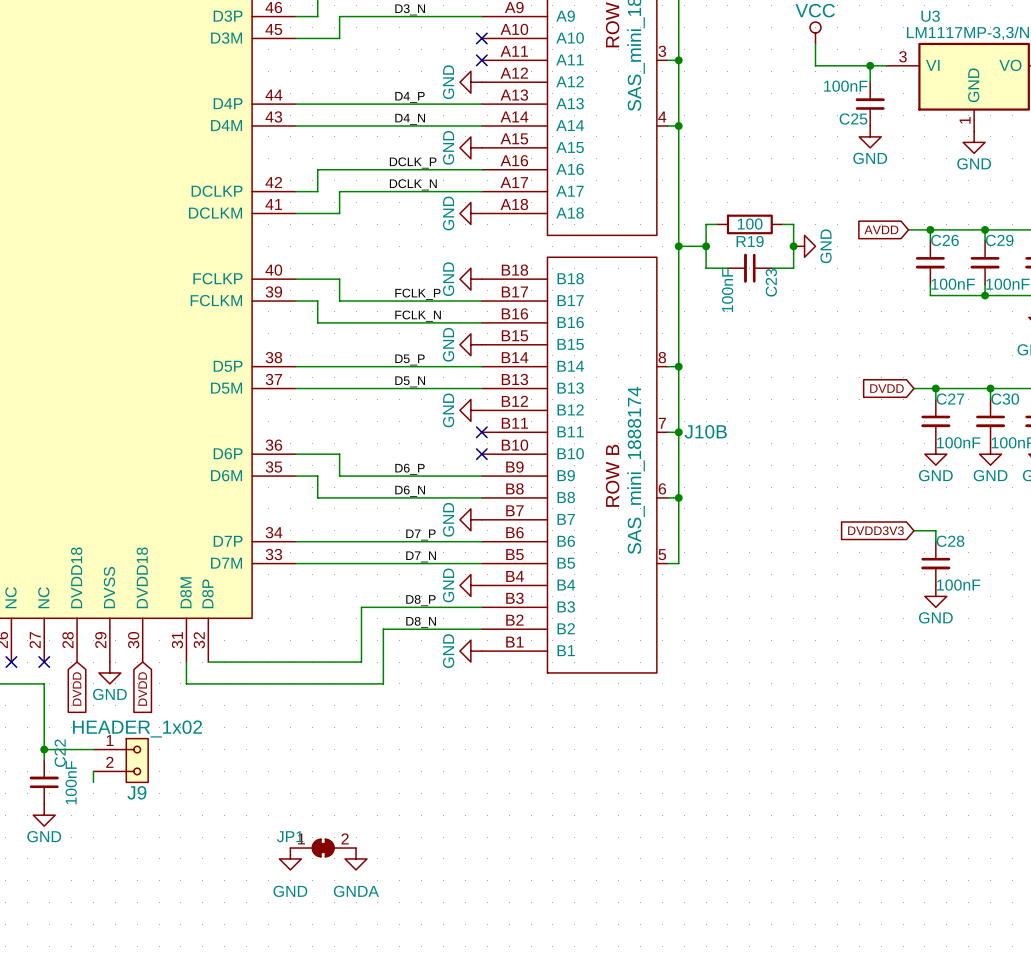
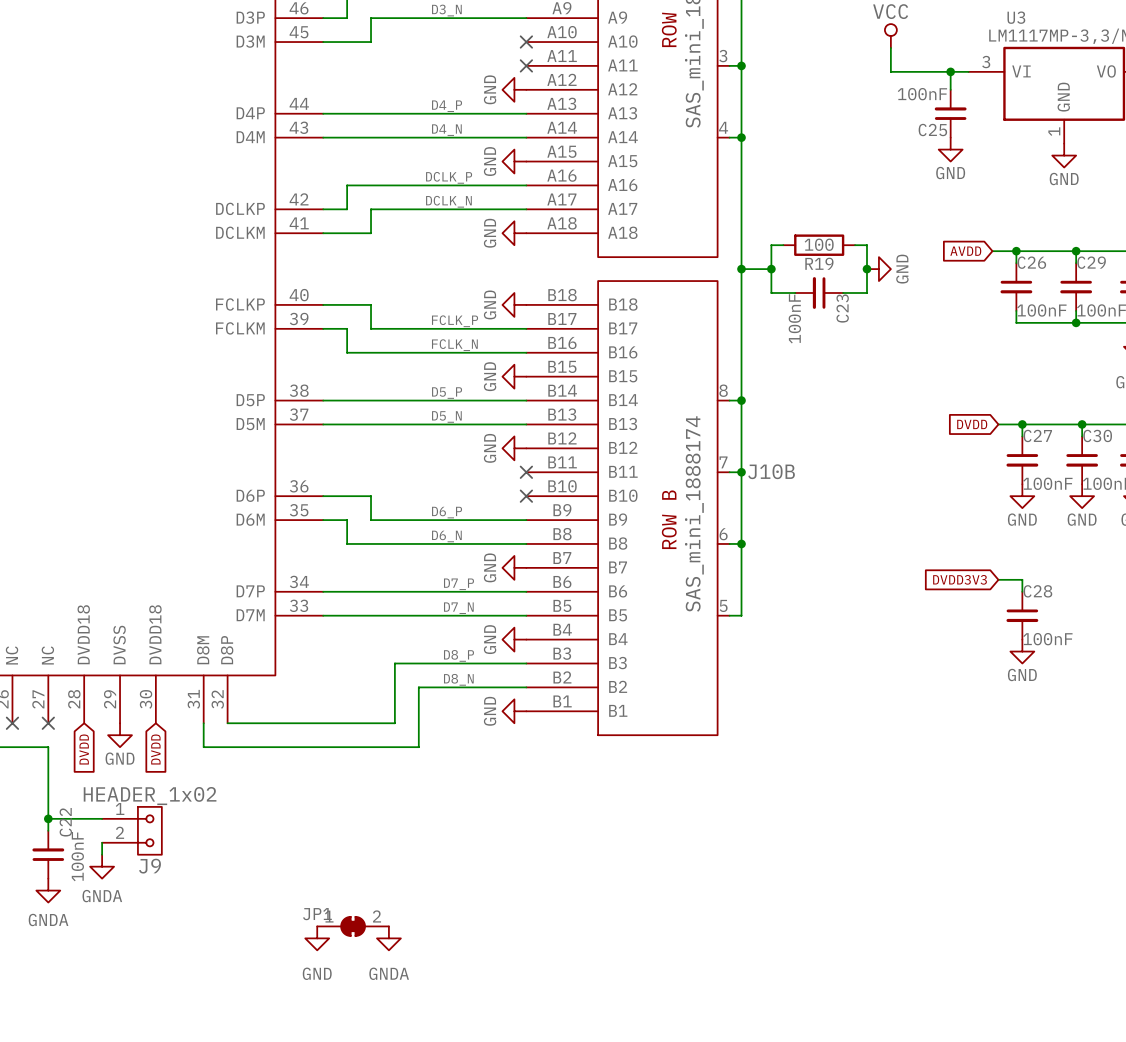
power symbol: none -> GNDA (102, 866)
power symbol: GND (44, 815) -> GNDA (48, 890)

